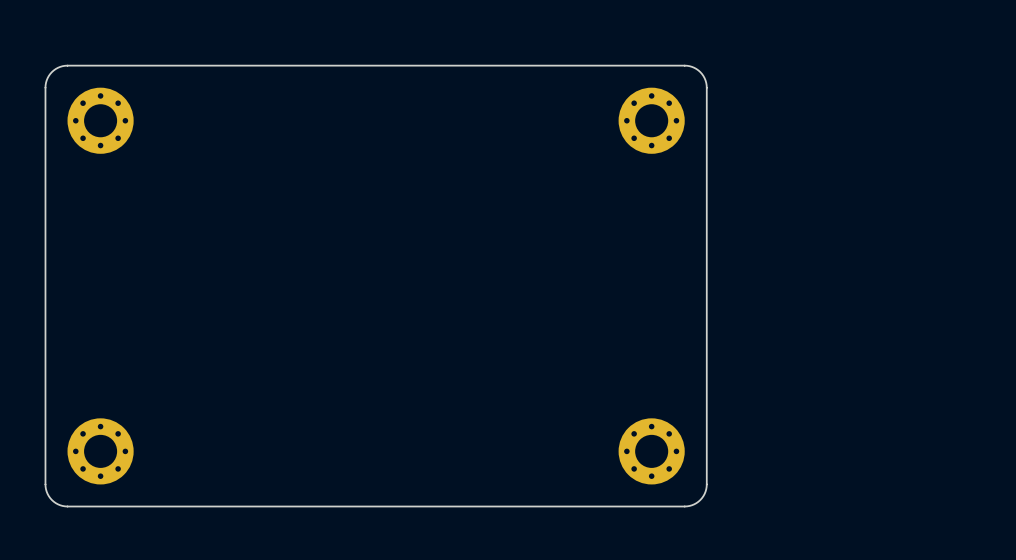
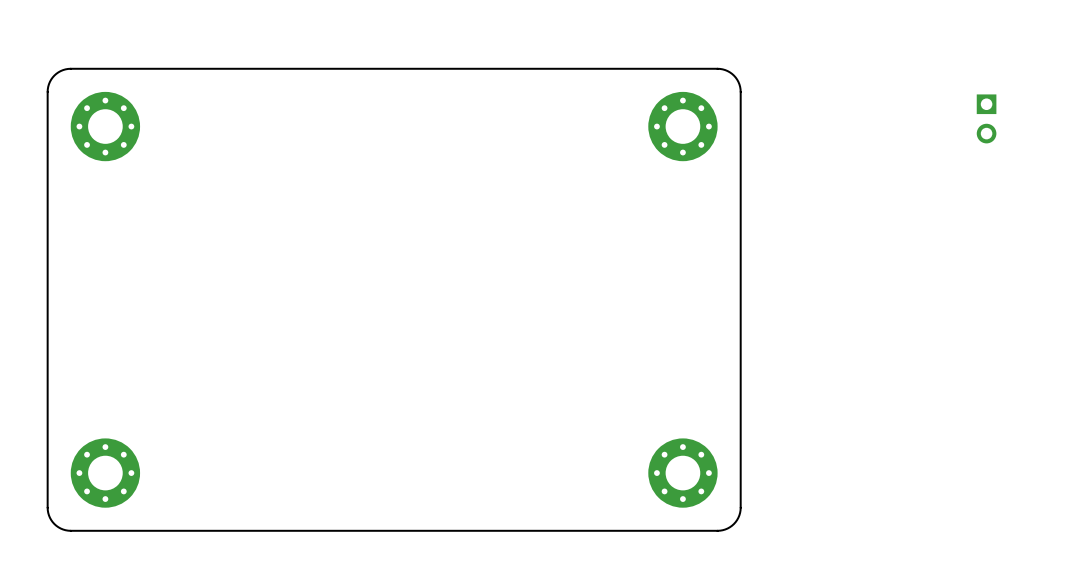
part: none -> (986, 118)

